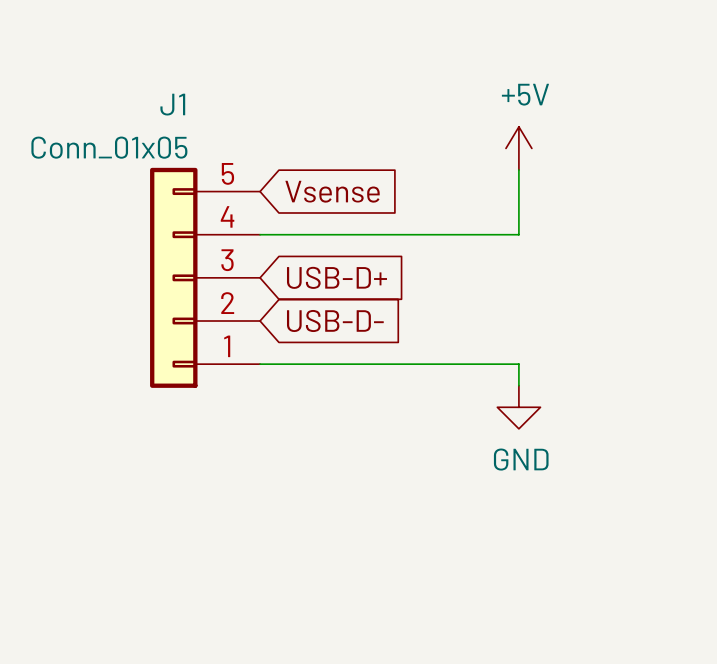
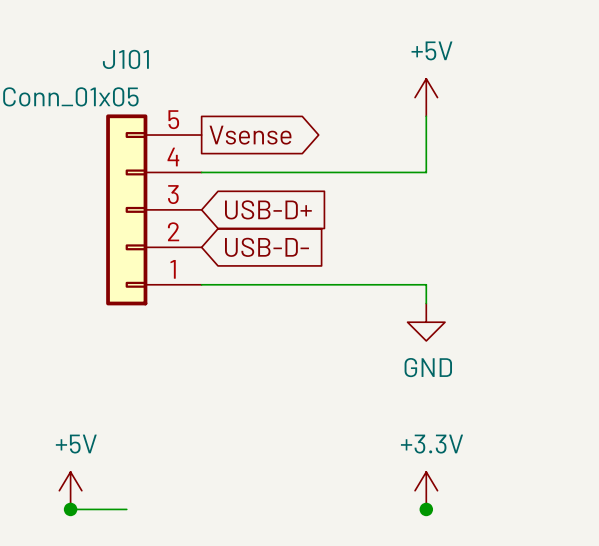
J1 name: J1 (172, 104) -> J101 (125, 59)
global label shape: input (332, 191) -> output (250, 135)
power symbol: none -> +5V (70, 490)
power symbol: none -> +3.3V (426, 490)
wire: none -> (70, 509) (126, 509)
junction: none -> (70, 509)
junction: none -> (426, 509)

